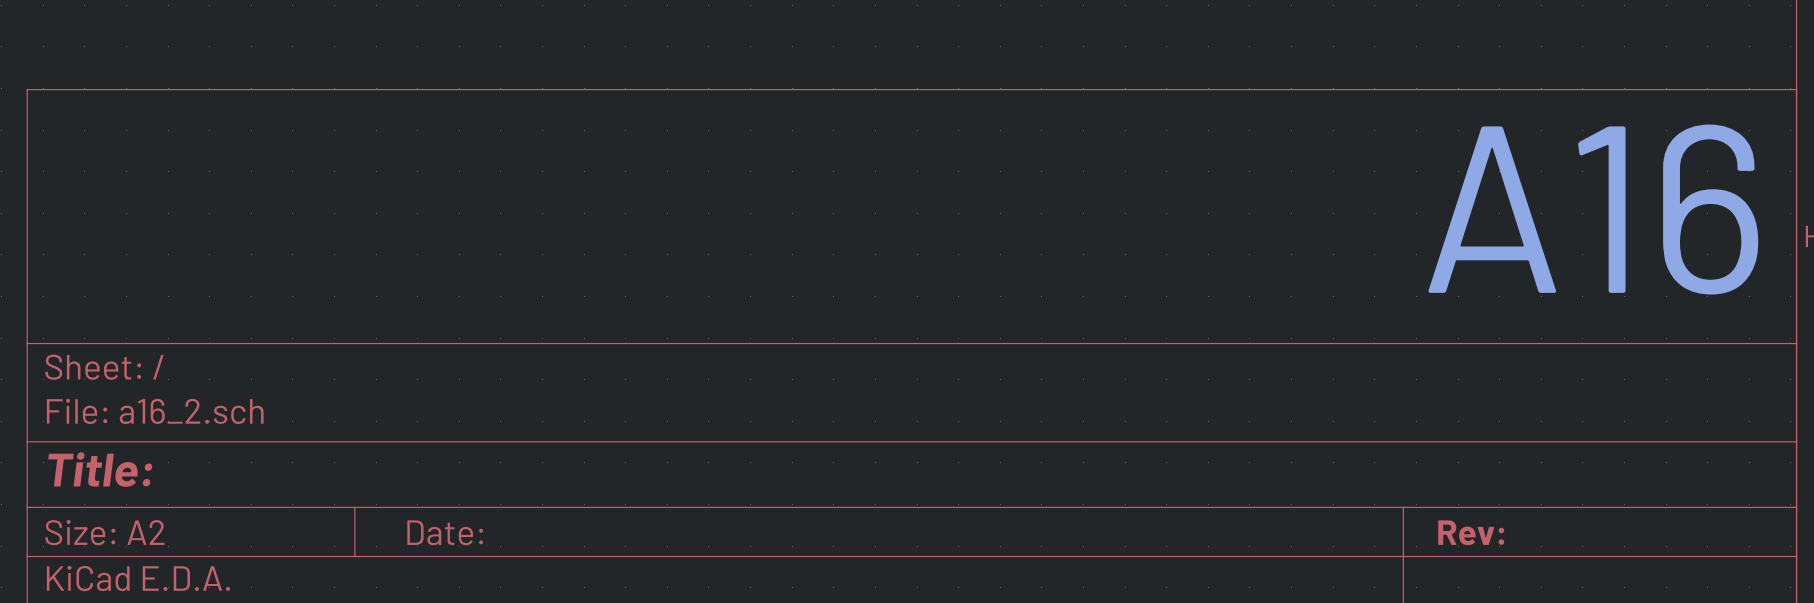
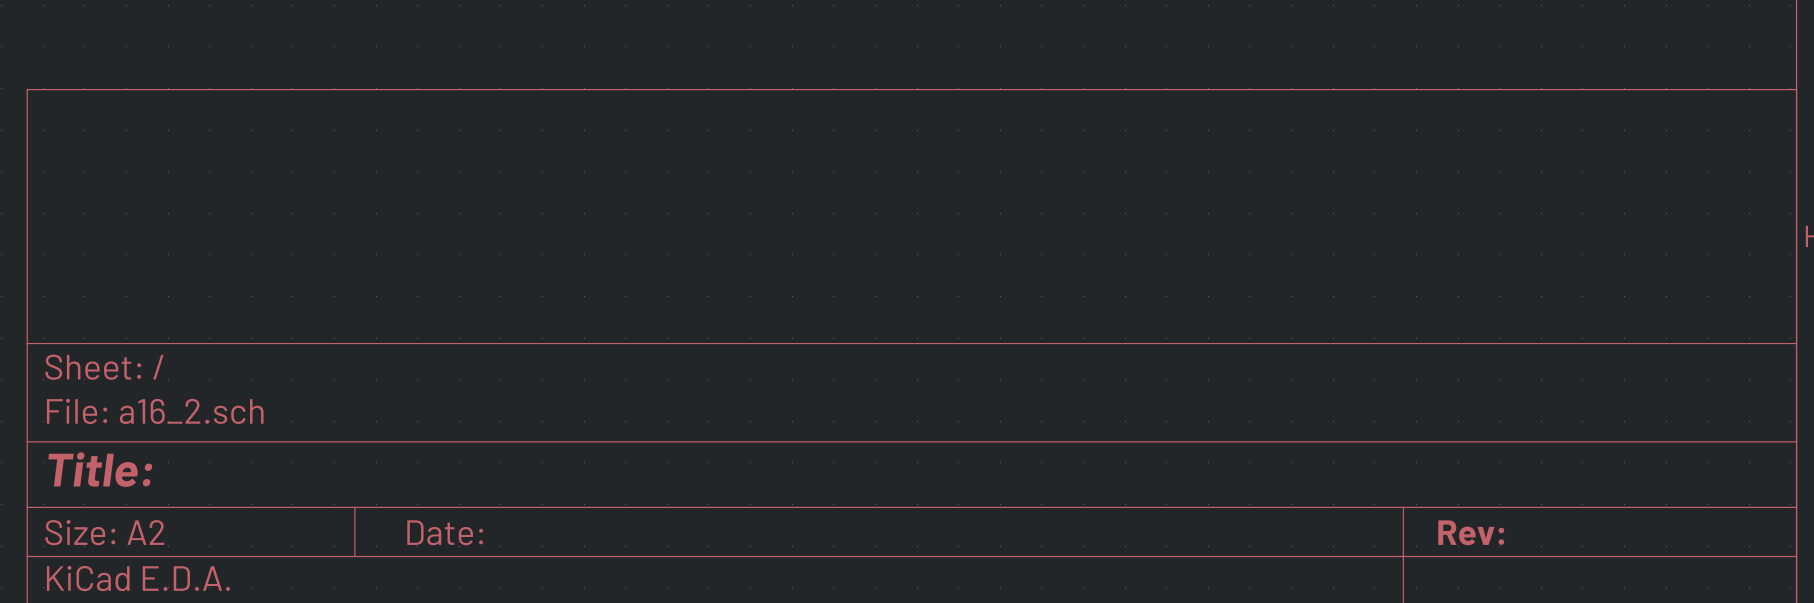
text: A16 (1593, 209) -> none

